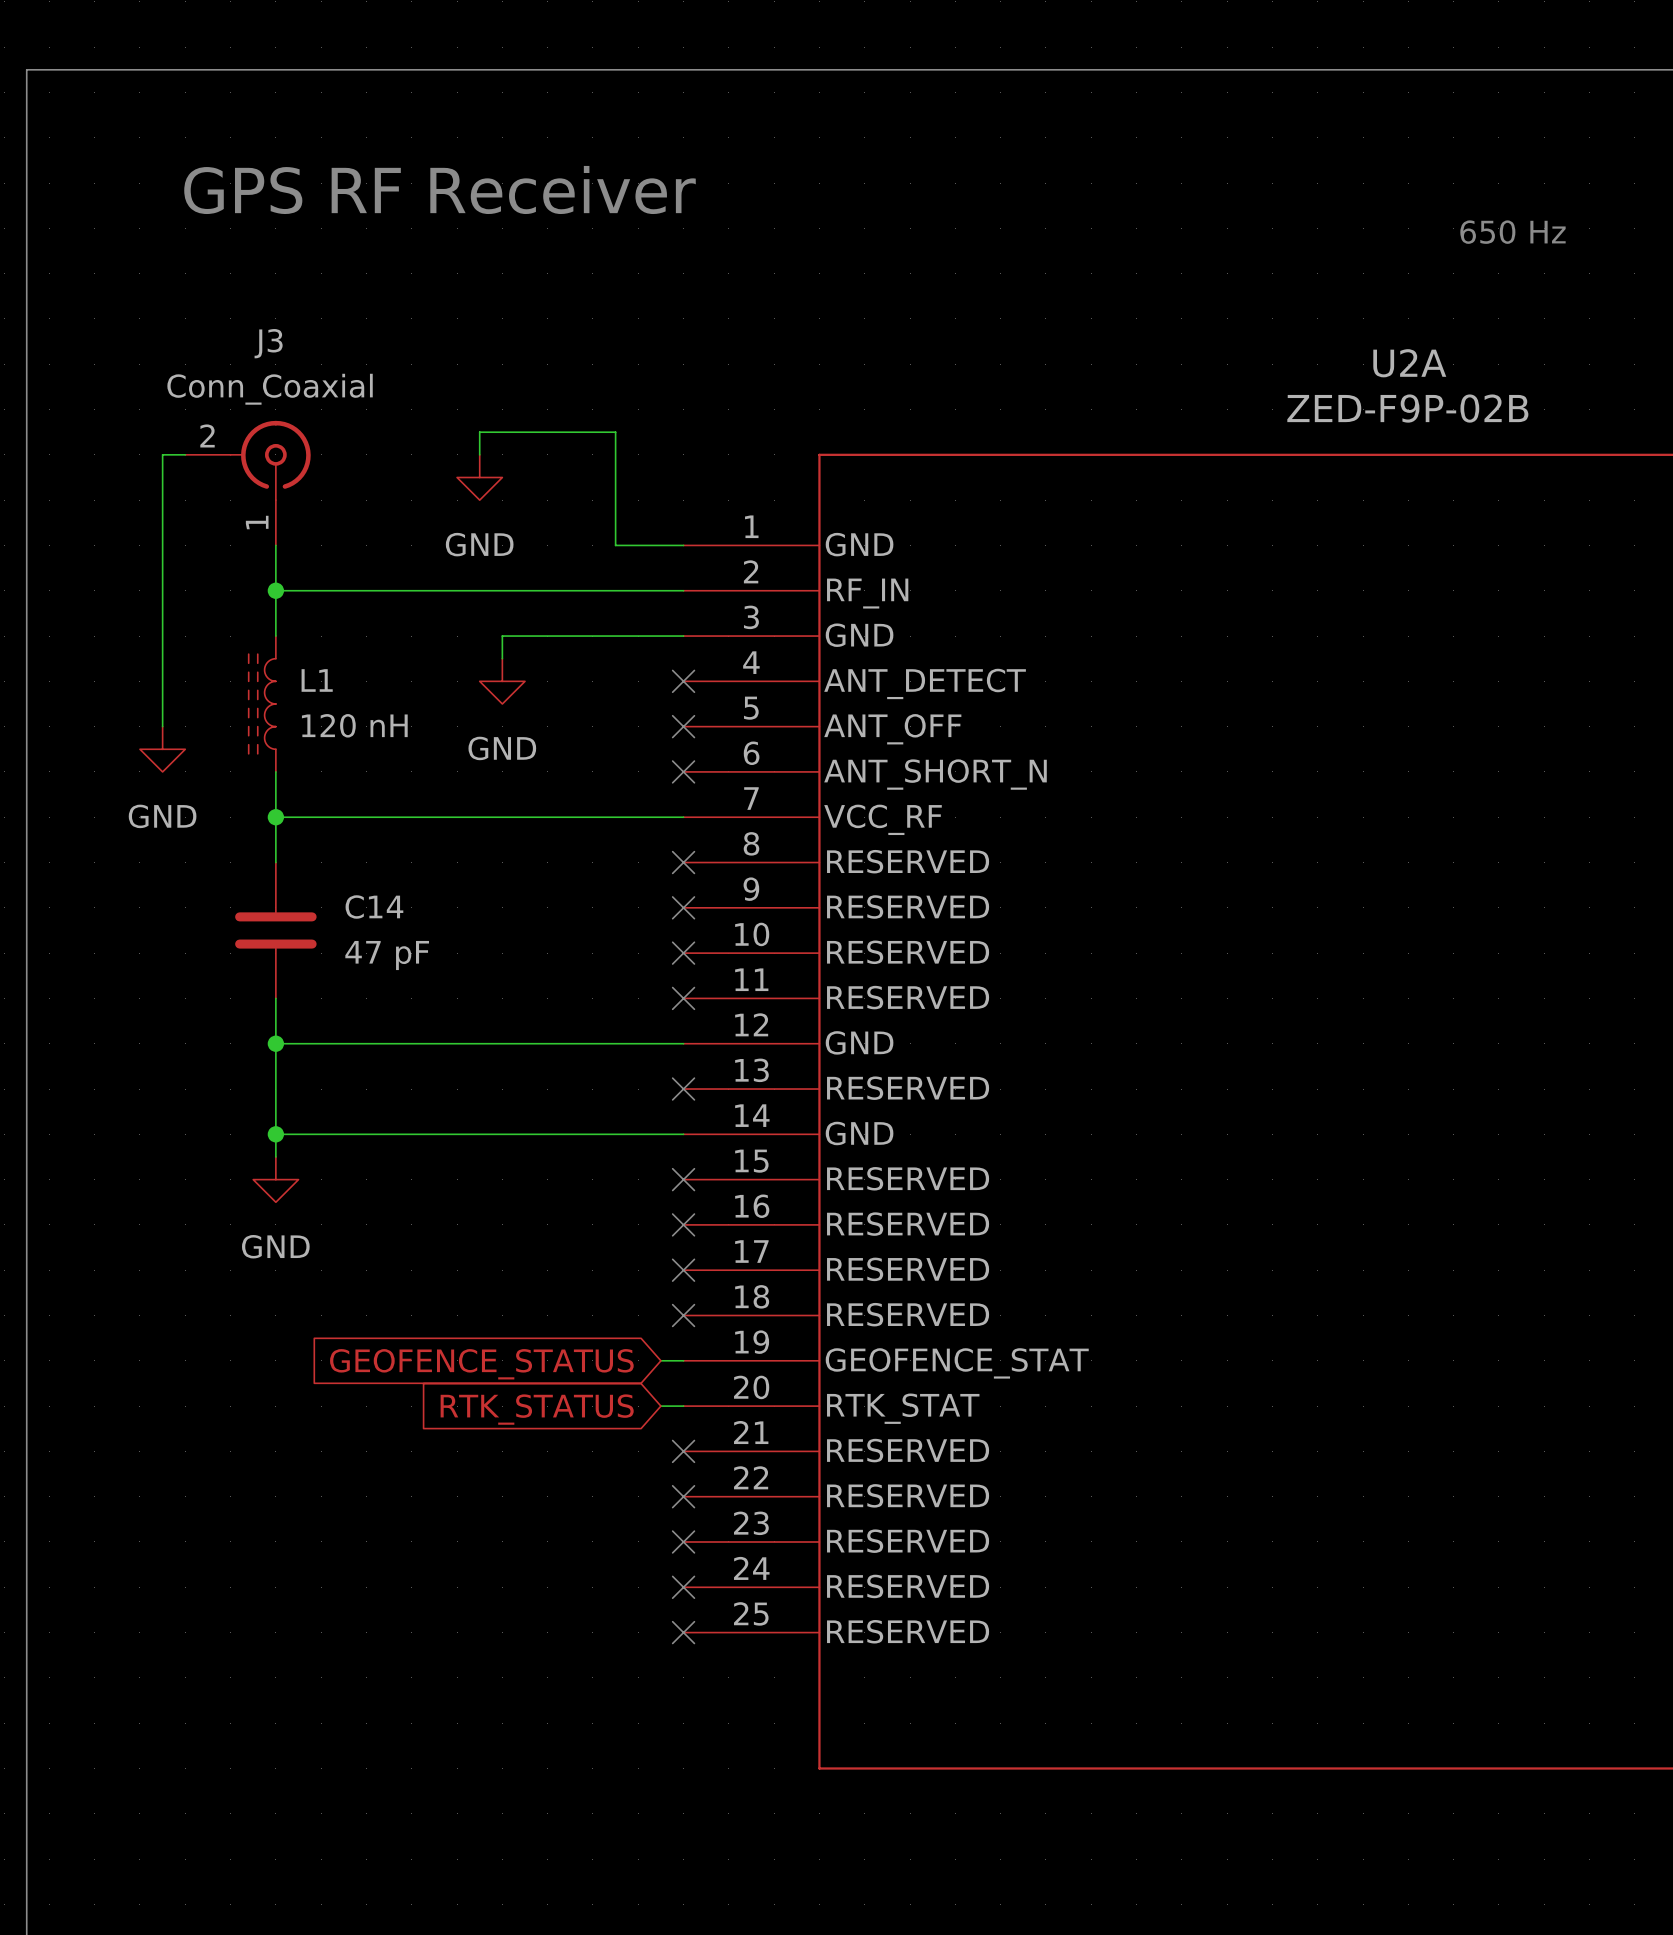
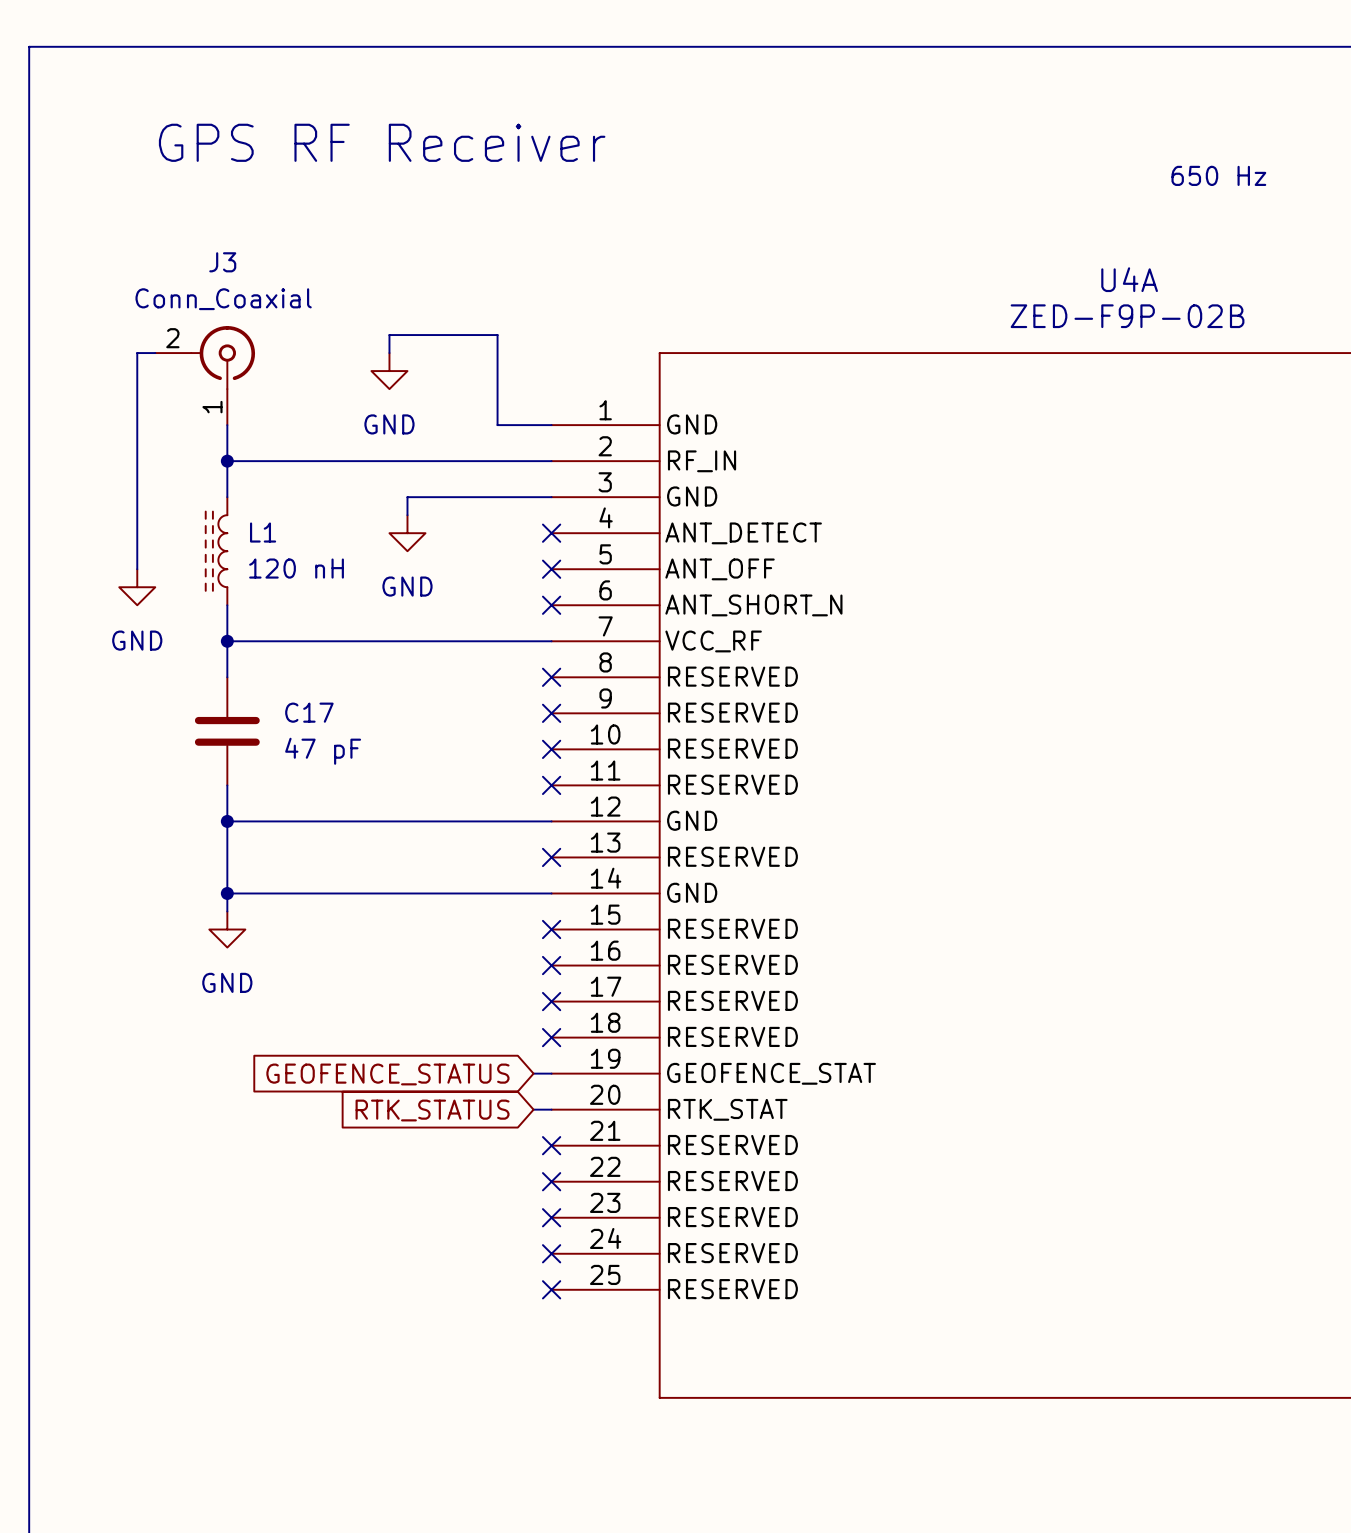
U2A name: U2A (1409, 363) -> U4A (1129, 279)
C14 name: C14 (374, 906) -> C17 (309, 712)

